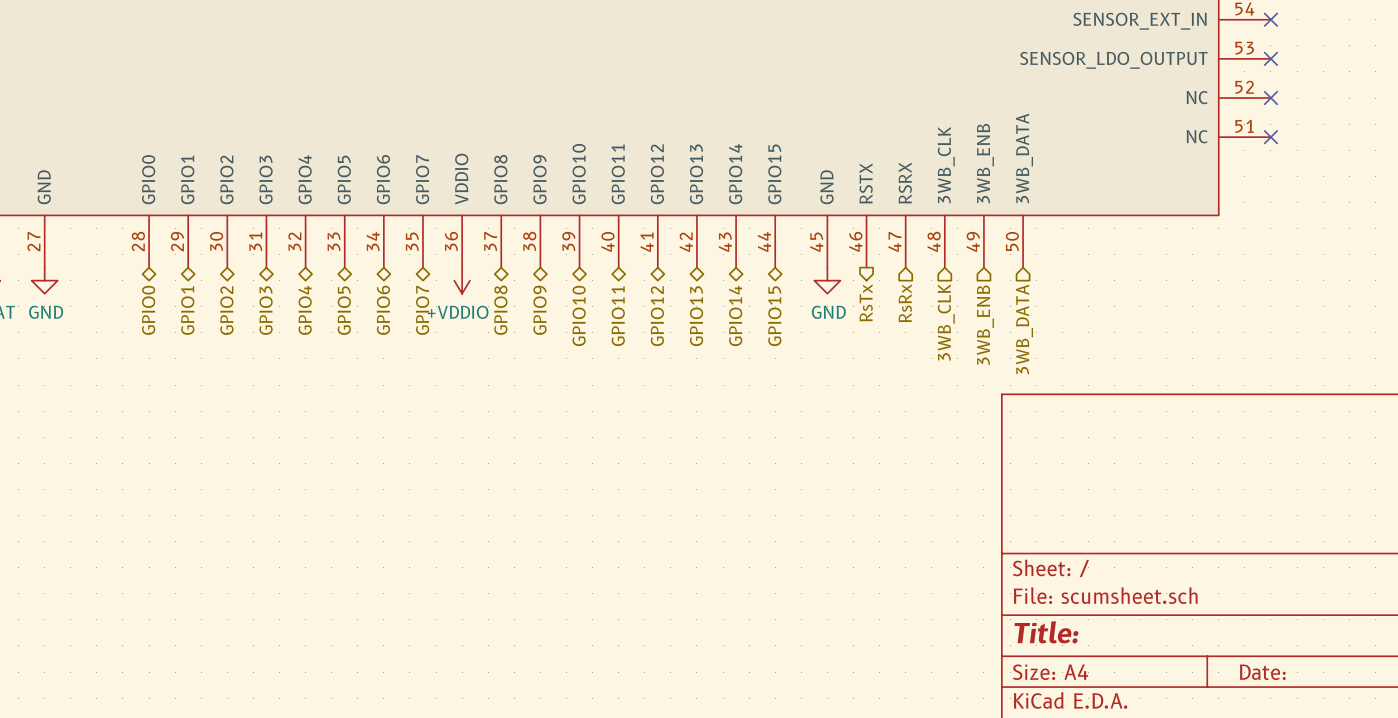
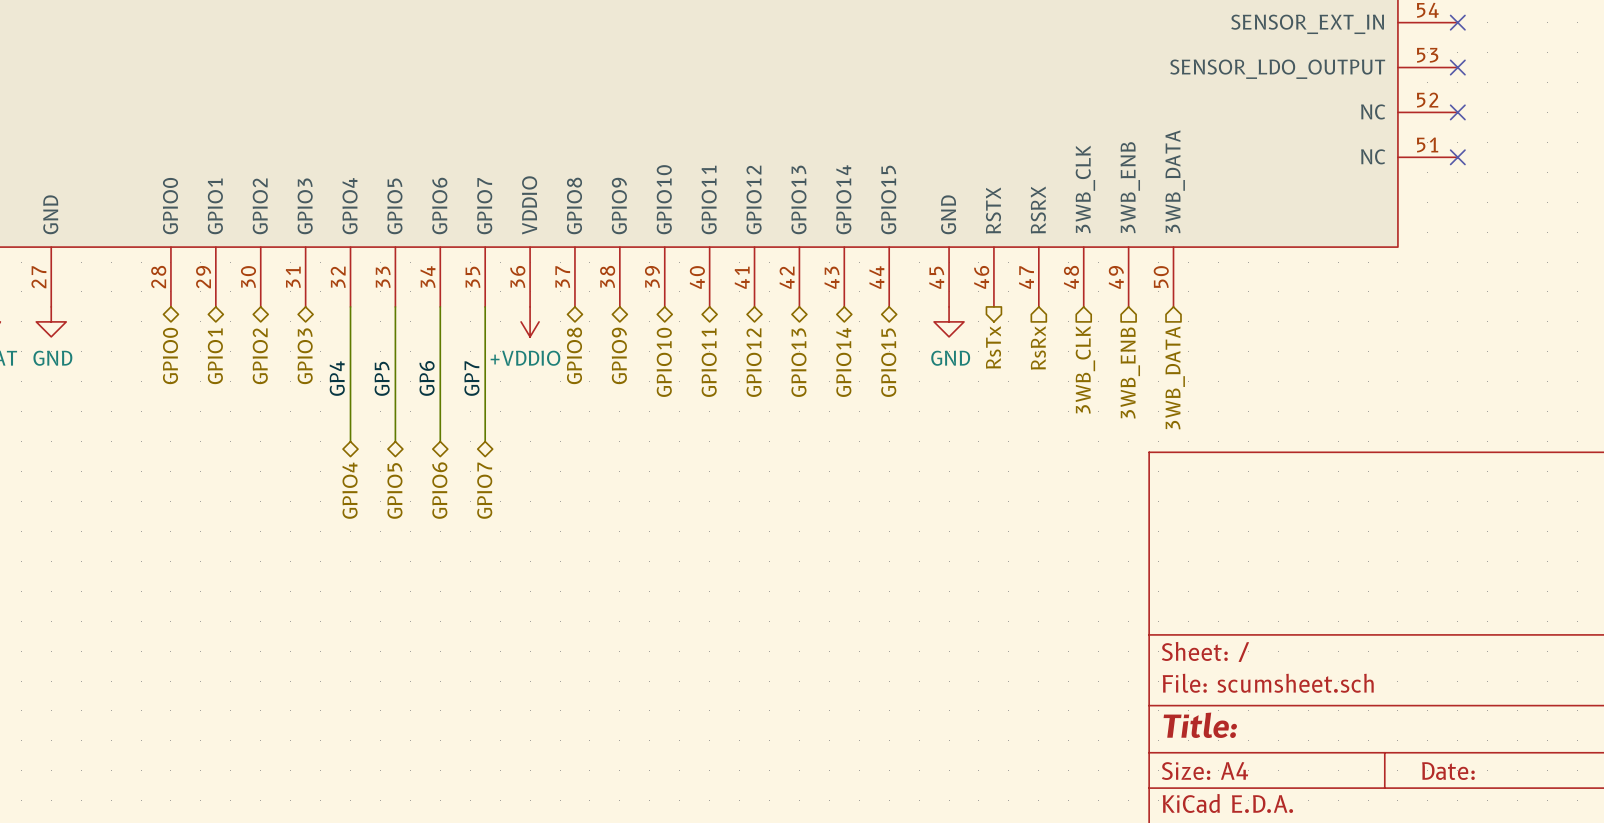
wire: none -> (350, 306) (350, 441)
wire: none -> (395, 306) (395, 441)
wire: none -> (440, 306) (440, 441)
wire: none -> (485, 306) (485, 441)
hierarchical label position: GPIO4 (305, 310) -> GPIO4 (350, 490)
hierarchical label position: GPIO5 (344, 310) -> GPIO5 (394, 490)
hierarchical label position: GPIO6 (383, 310) -> GPIO6 (439, 490)
hierarchical label position: GPIO7 (422, 310) -> GPIO7 (484, 490)
label: none -> GP6 (427, 378)
label: none -> GP4 (337, 378)
label: none -> GP5 (382, 378)
label: none -> GP7 (471, 378)

